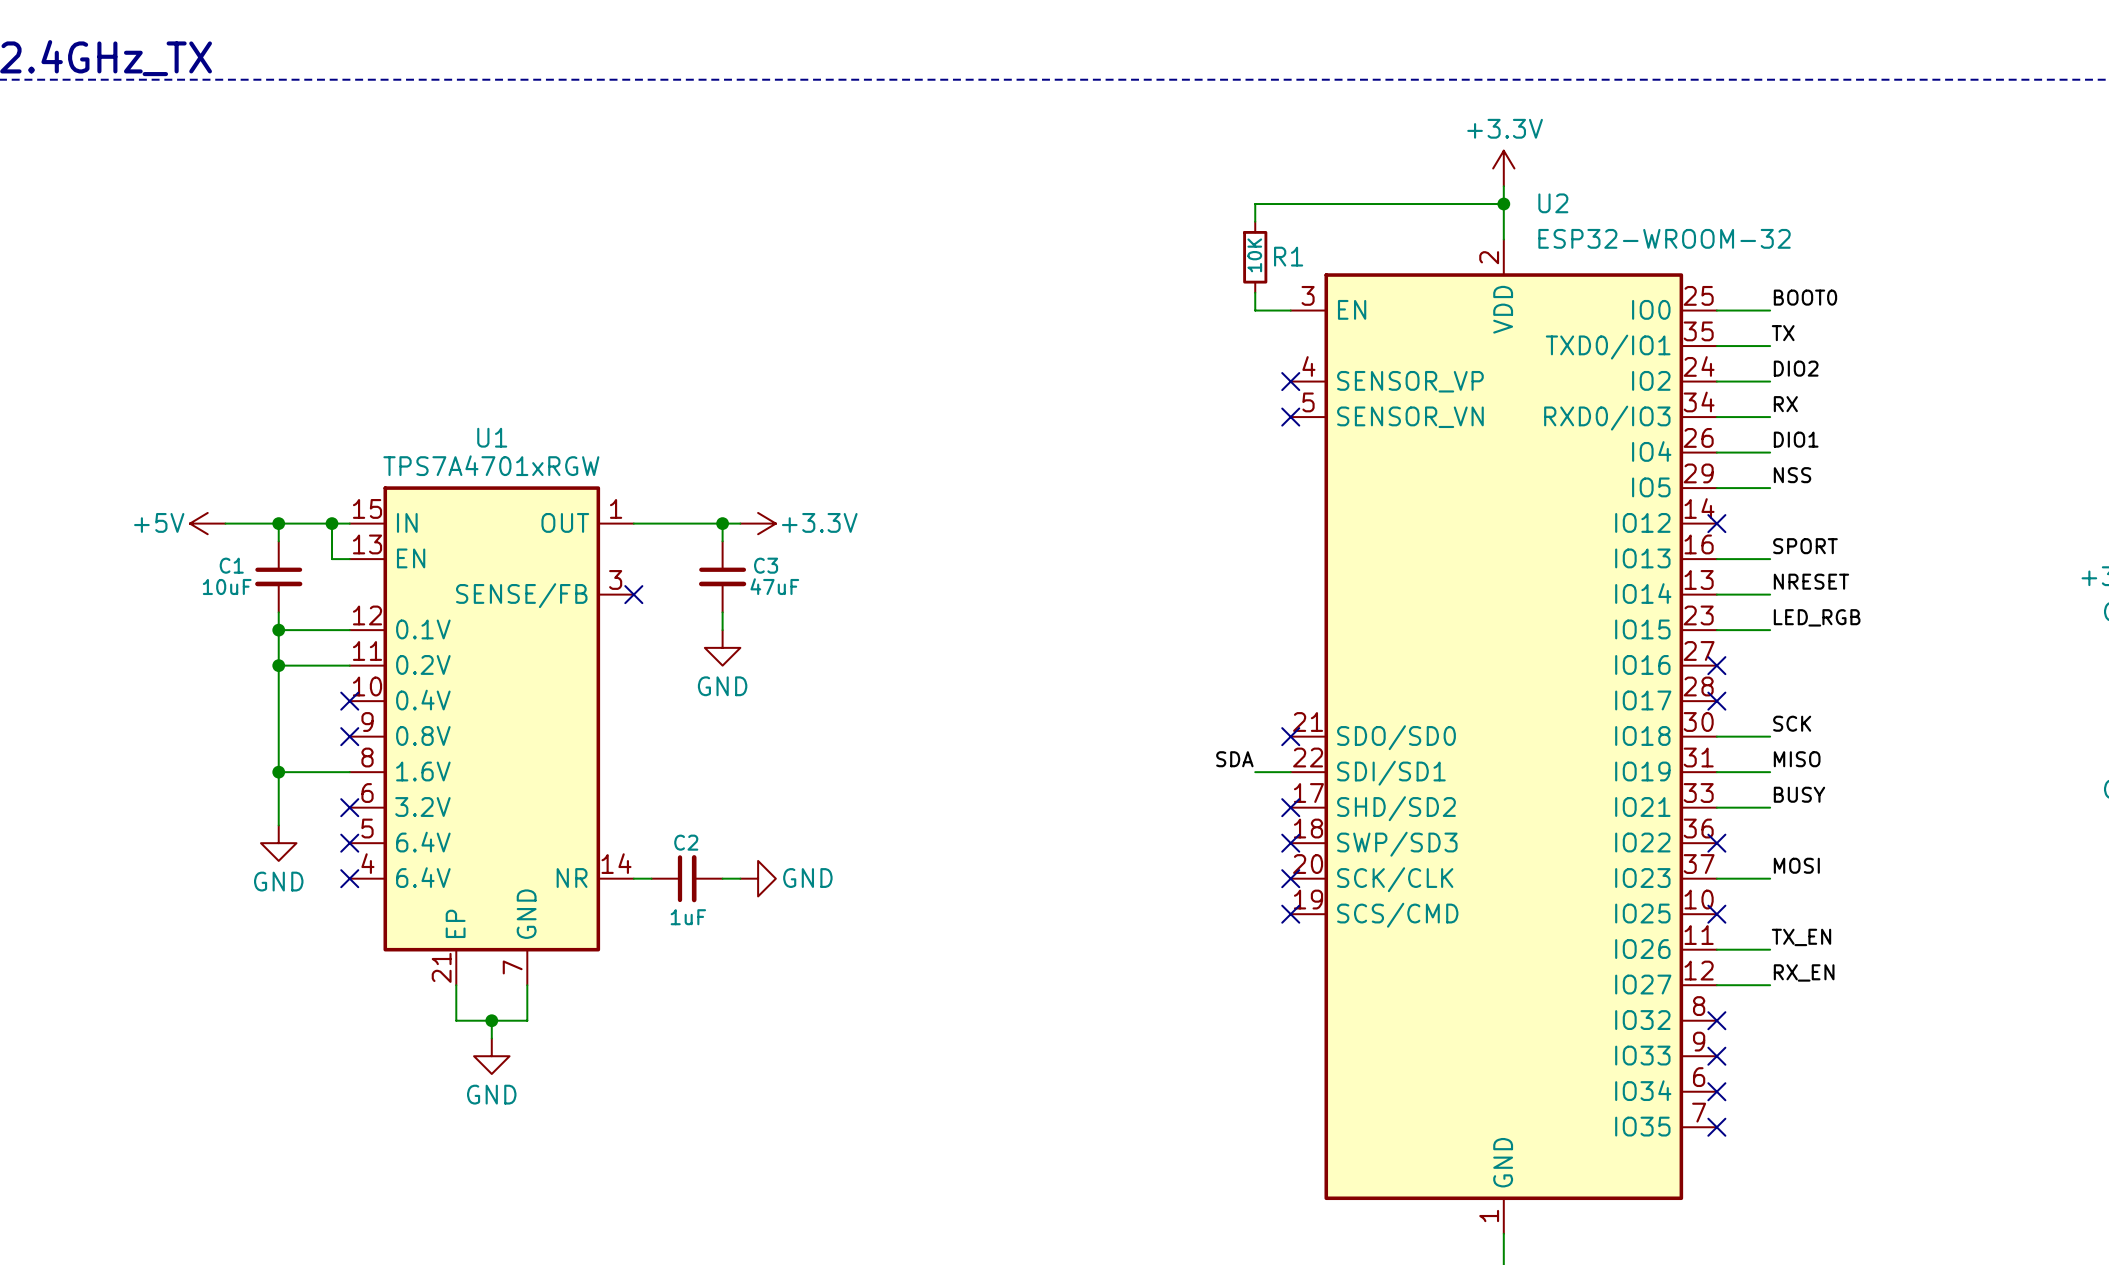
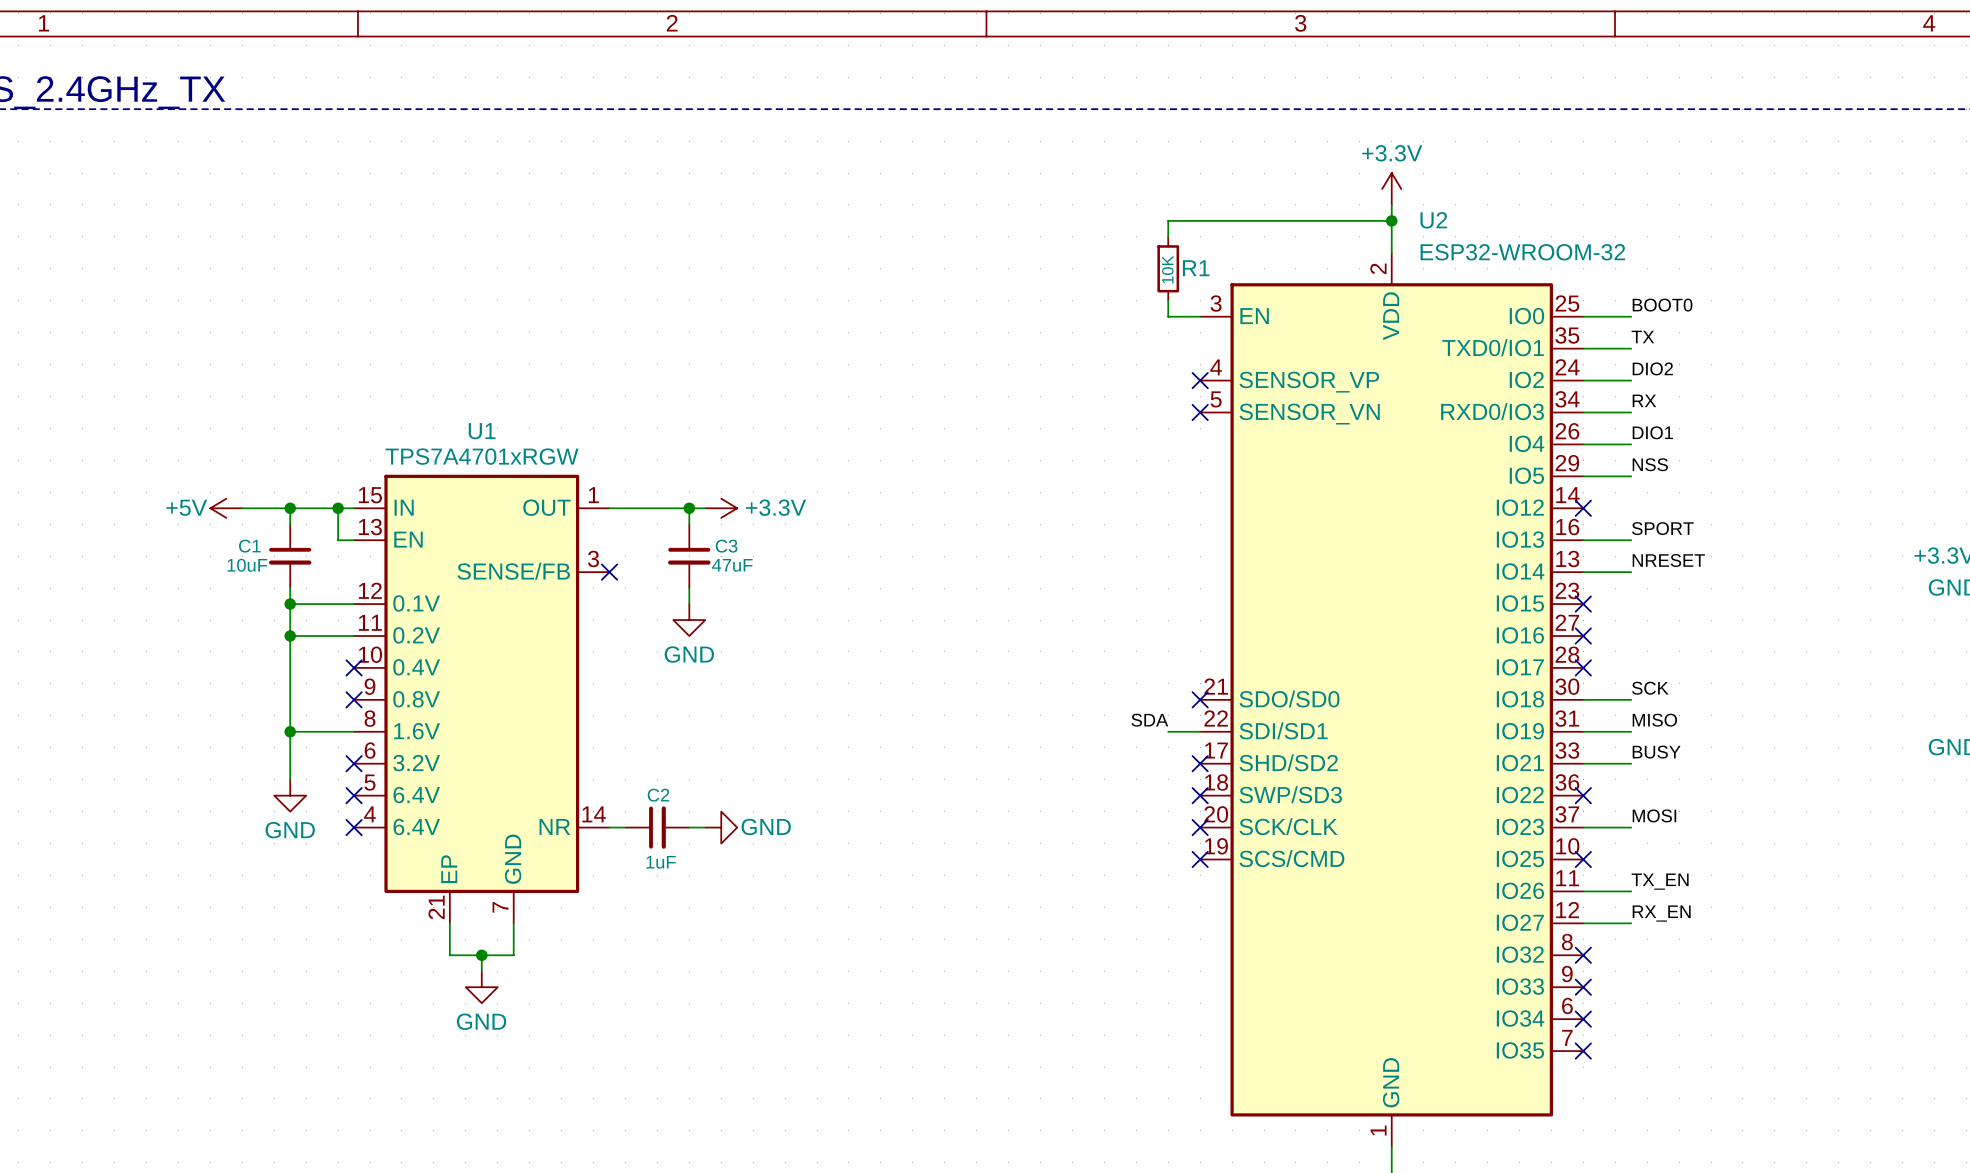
label: LED_RGB (1817, 617) -> none
wire: (1716, 630) (1770, 630) -> none
no-connect mark: none -> (1583, 604)

